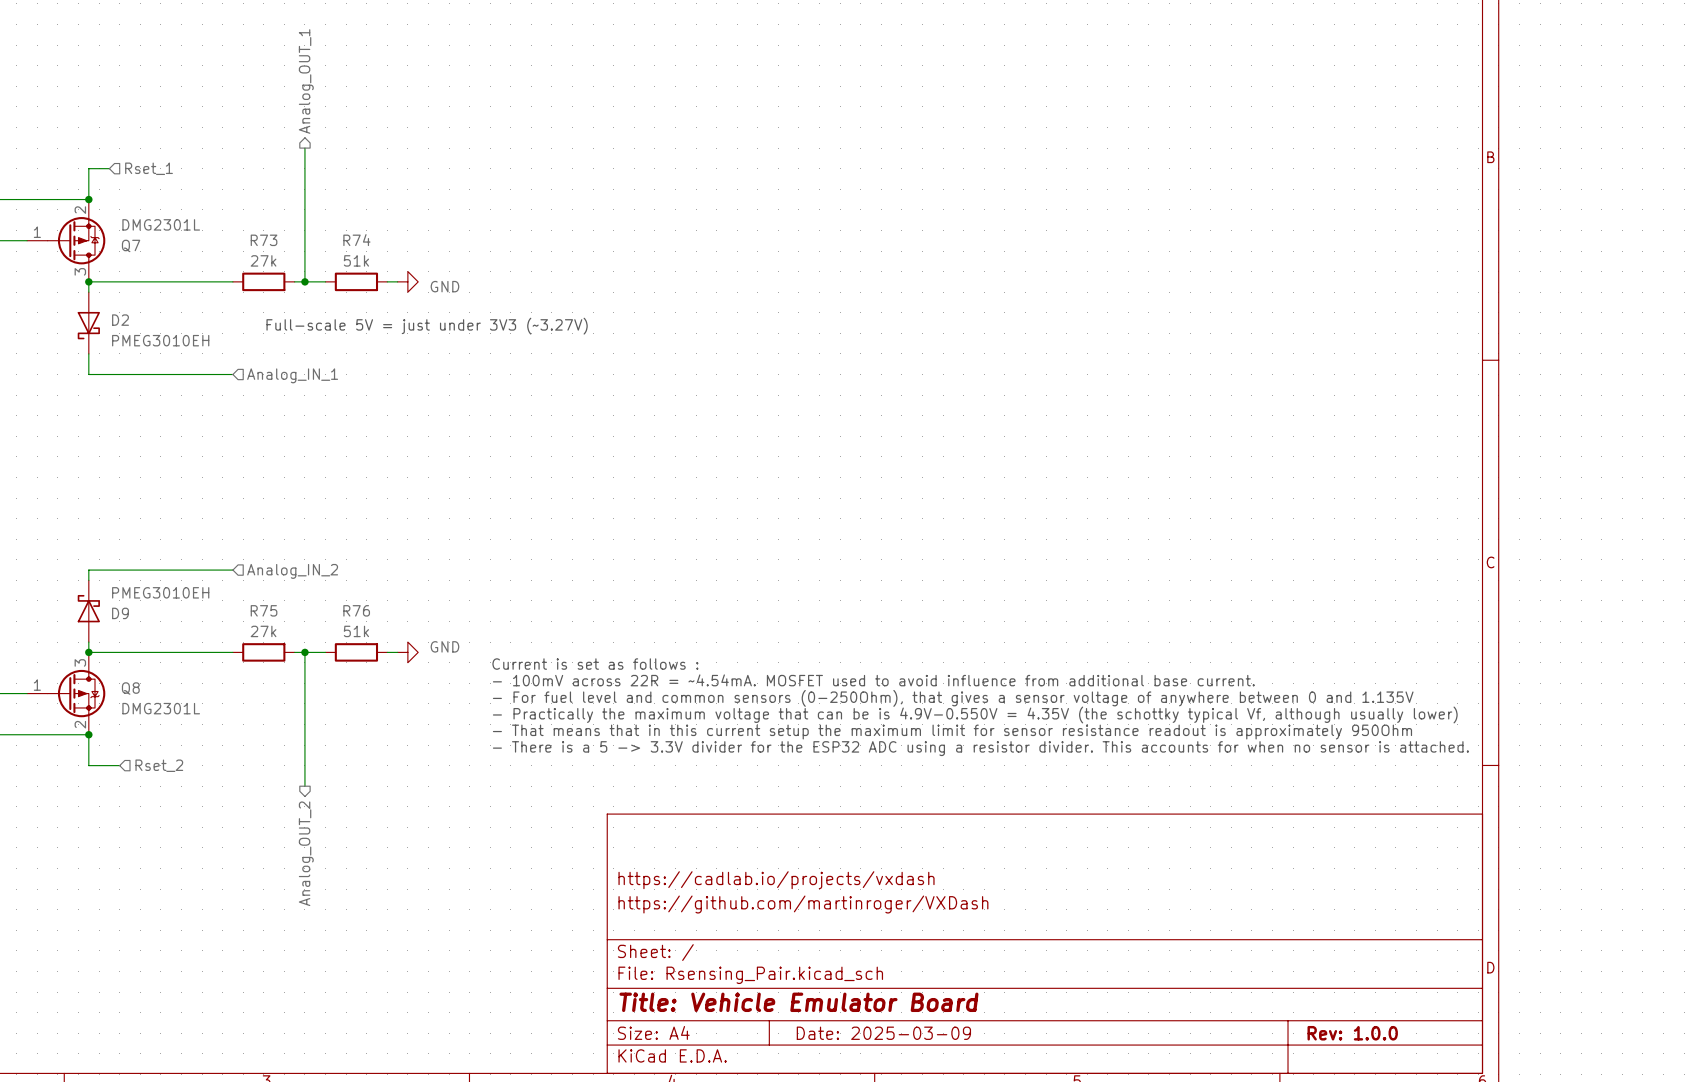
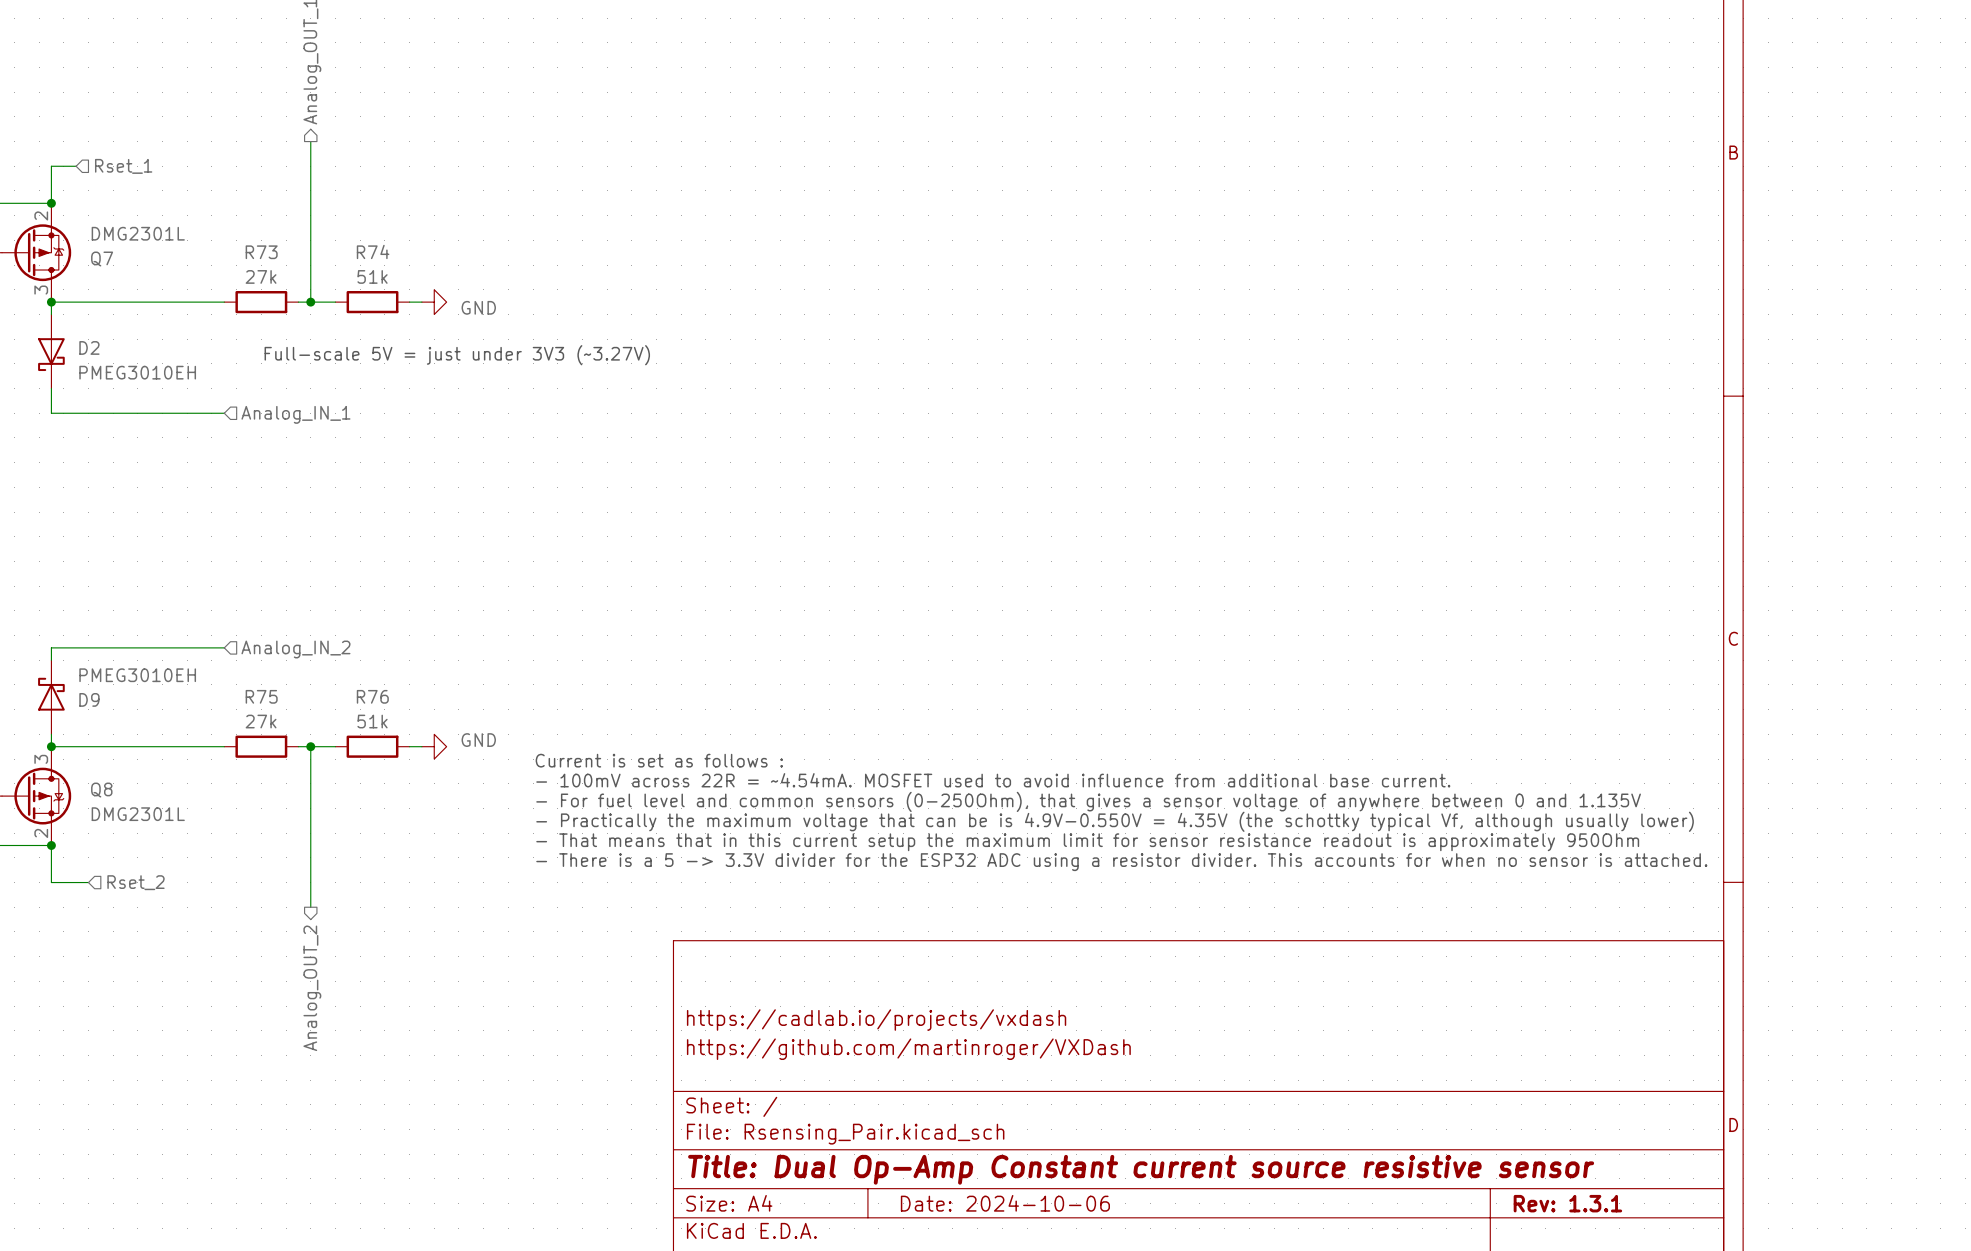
title block: Title: Vehicle Emulator Board (798, 1002) -> Title: Dual Op-Amp Constant current source resistive sensor (1141, 1169)
title block: Date: 2025-03-09 (883, 1033) -> Date: 2024-10-06 (1005, 1203)
title block: Rev: 1.0.0 (1352, 1033) -> Rev: 1.3.1 (1567, 1203)

